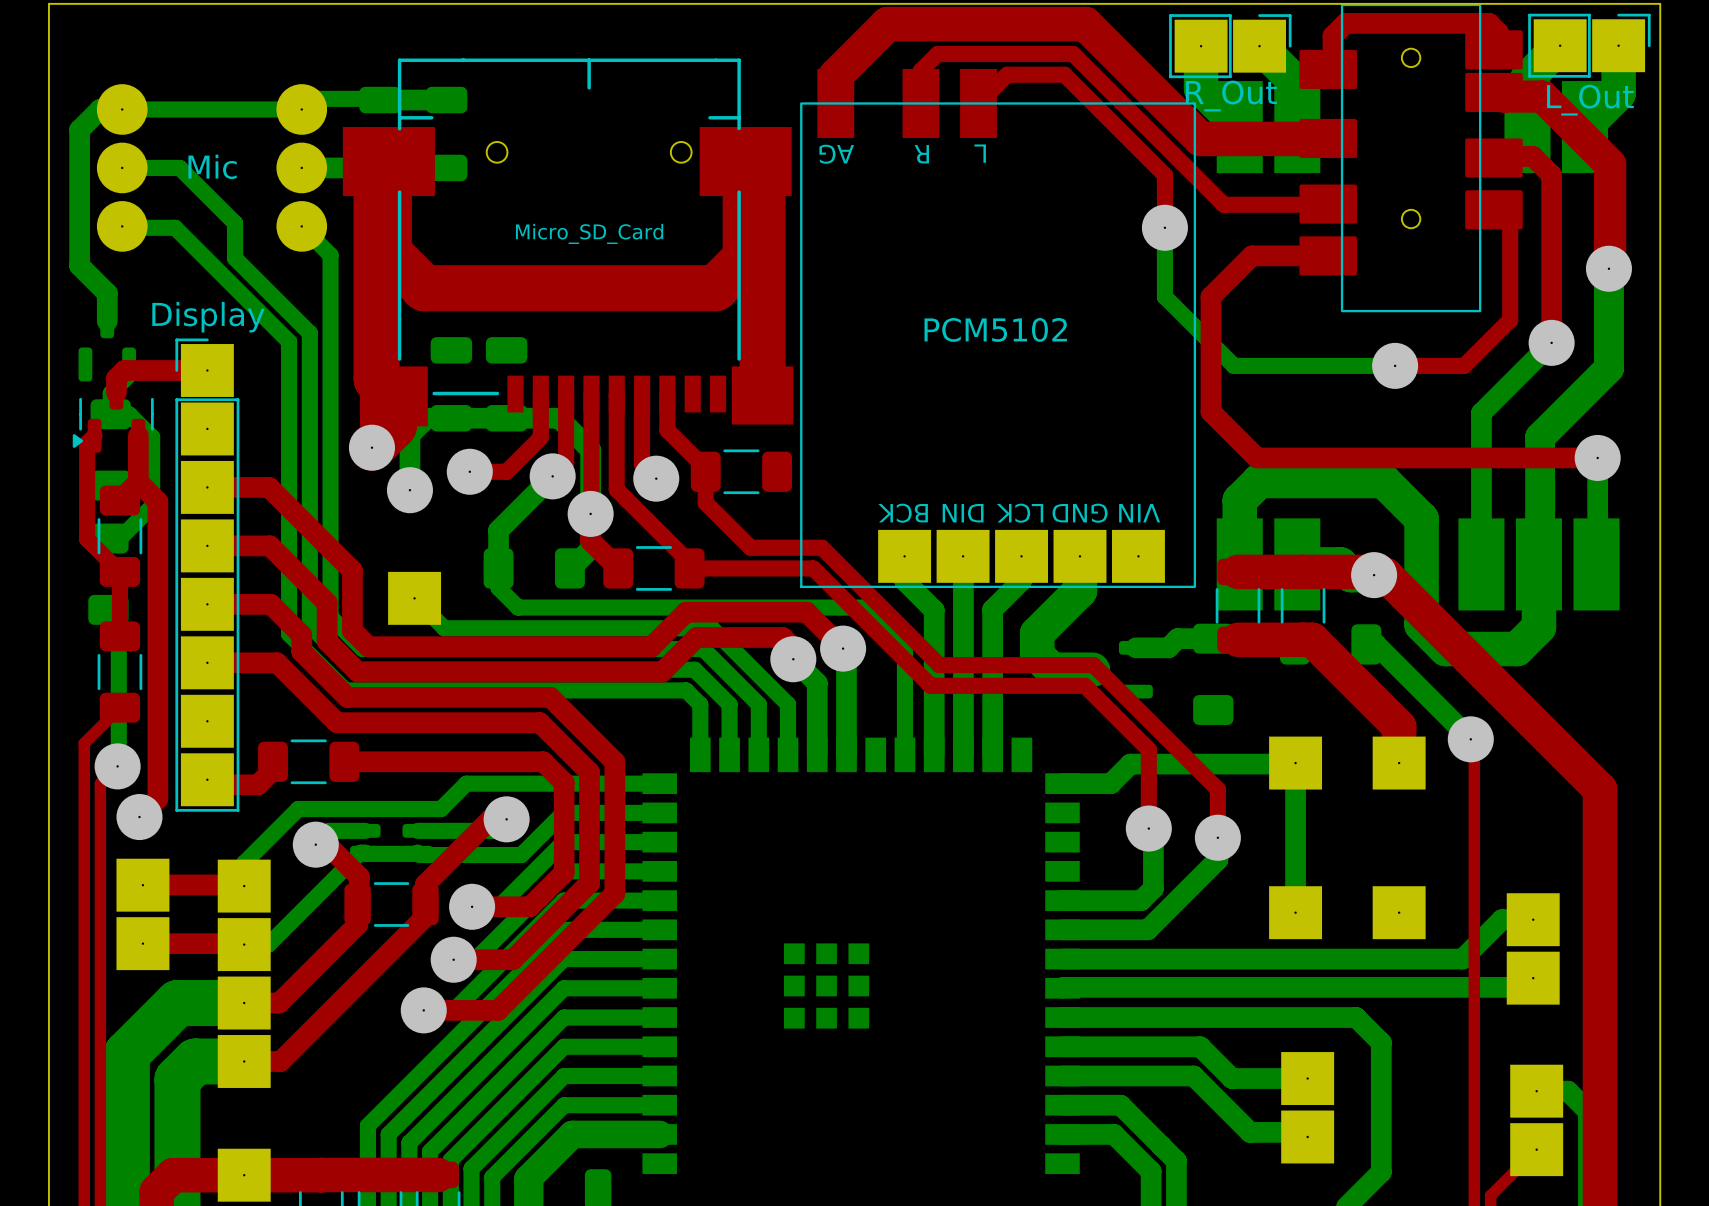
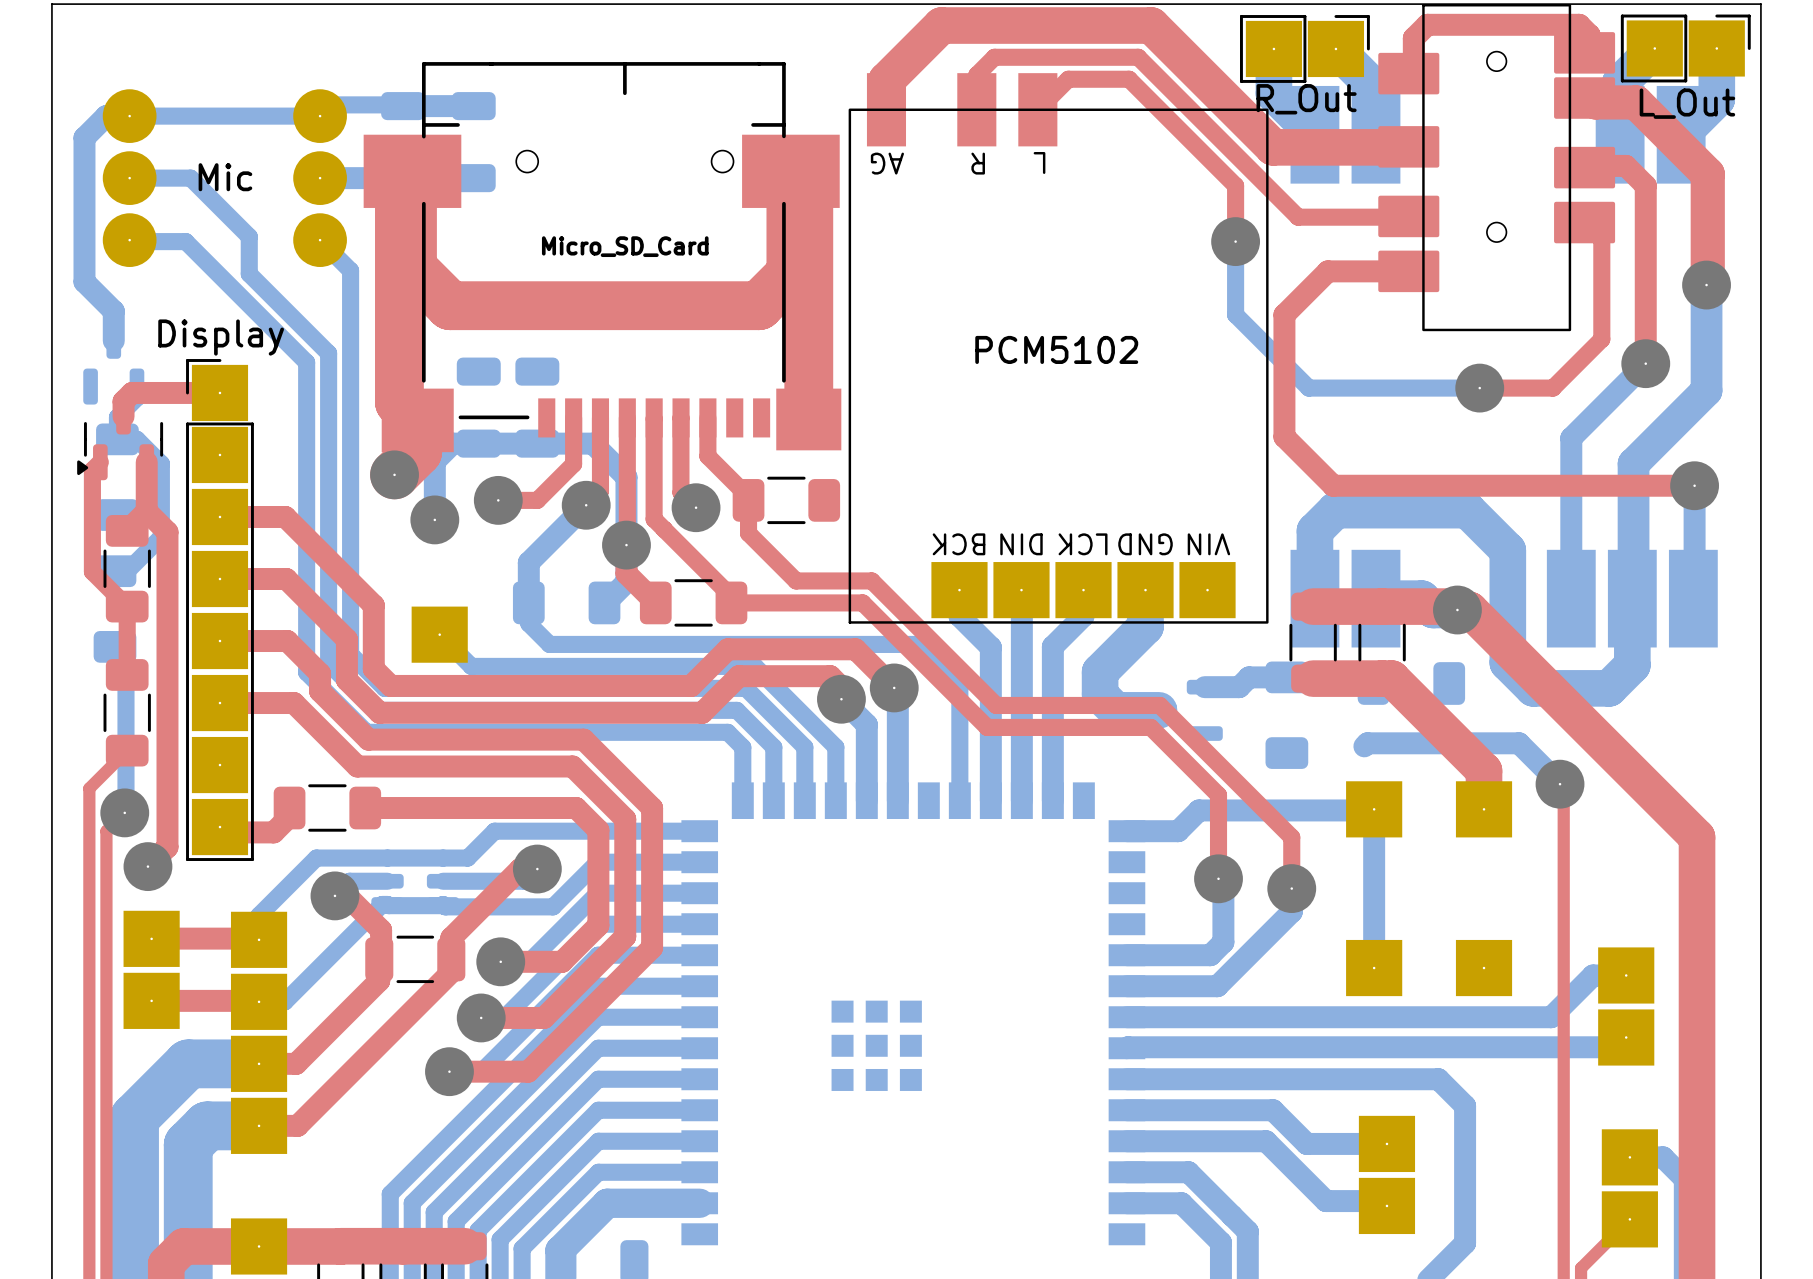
bottom track: (1366, 644) (1375, 644) (1432, 700) -> (1364, 746) (1367, 743) (1519, 743)

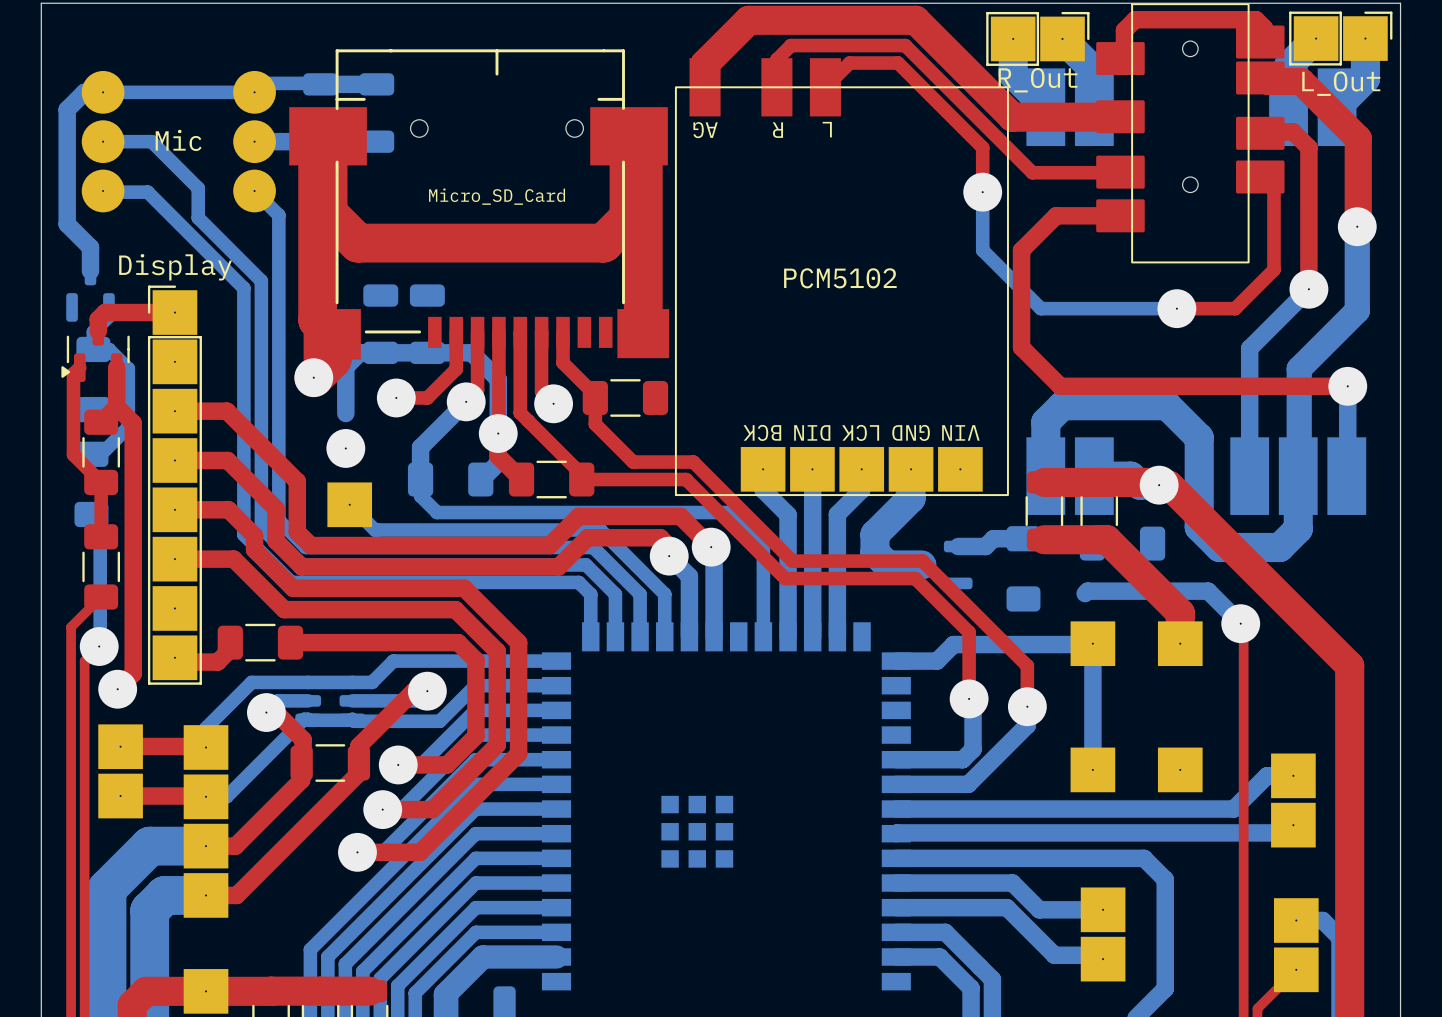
via position: (434, 519) -> (345, 448)

